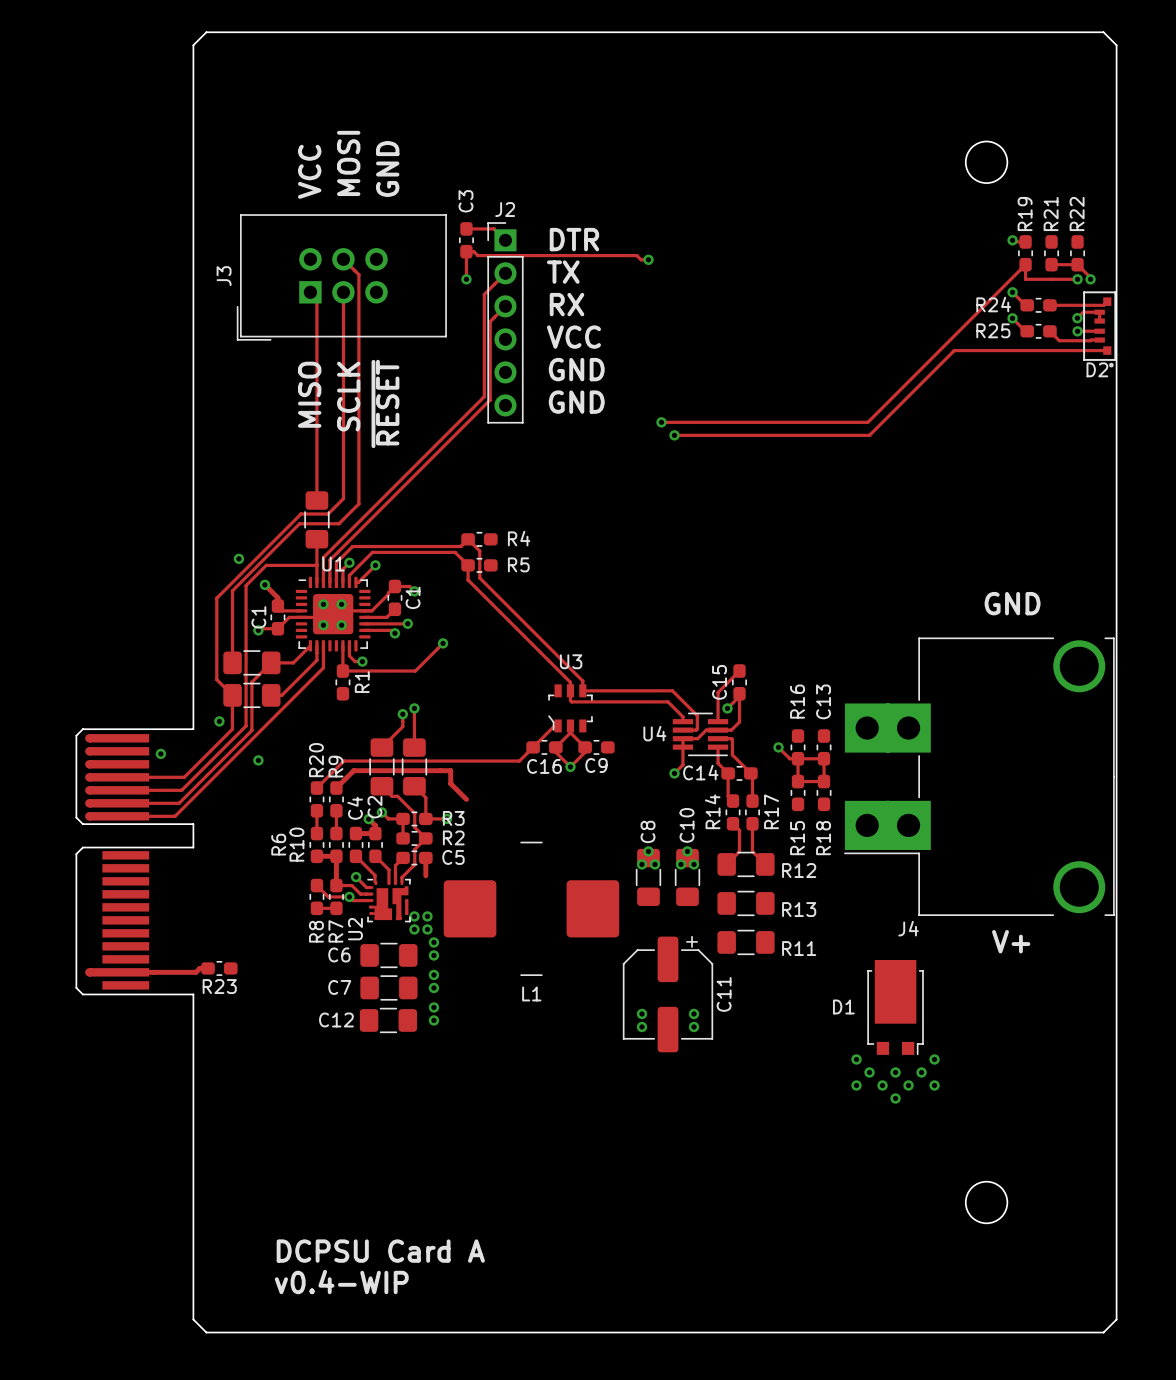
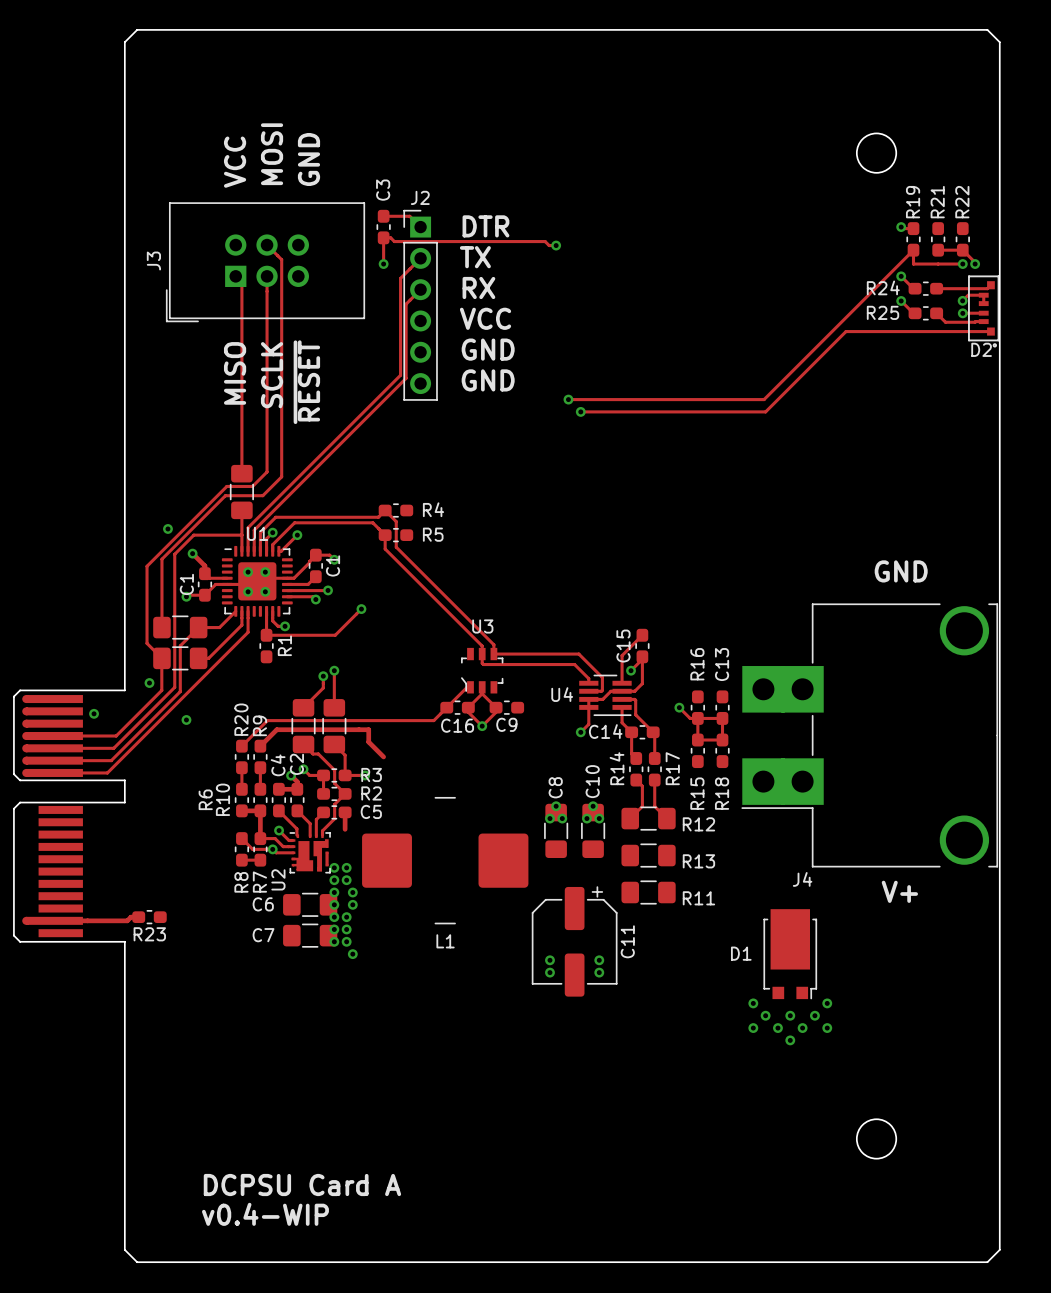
via: none -> (334, 892)
via: none -> (334, 904)
via: none -> (334, 917)
via: none -> (346, 917)
via: (433, 974) -> none
via: none -> (334, 929)
via: none -> (346, 929)
via: (433, 987) -> none
via: none -> (334, 941)
via: none -> (346, 941)
C12: (388, 1020) -> none
via: (433, 1020) -> none

